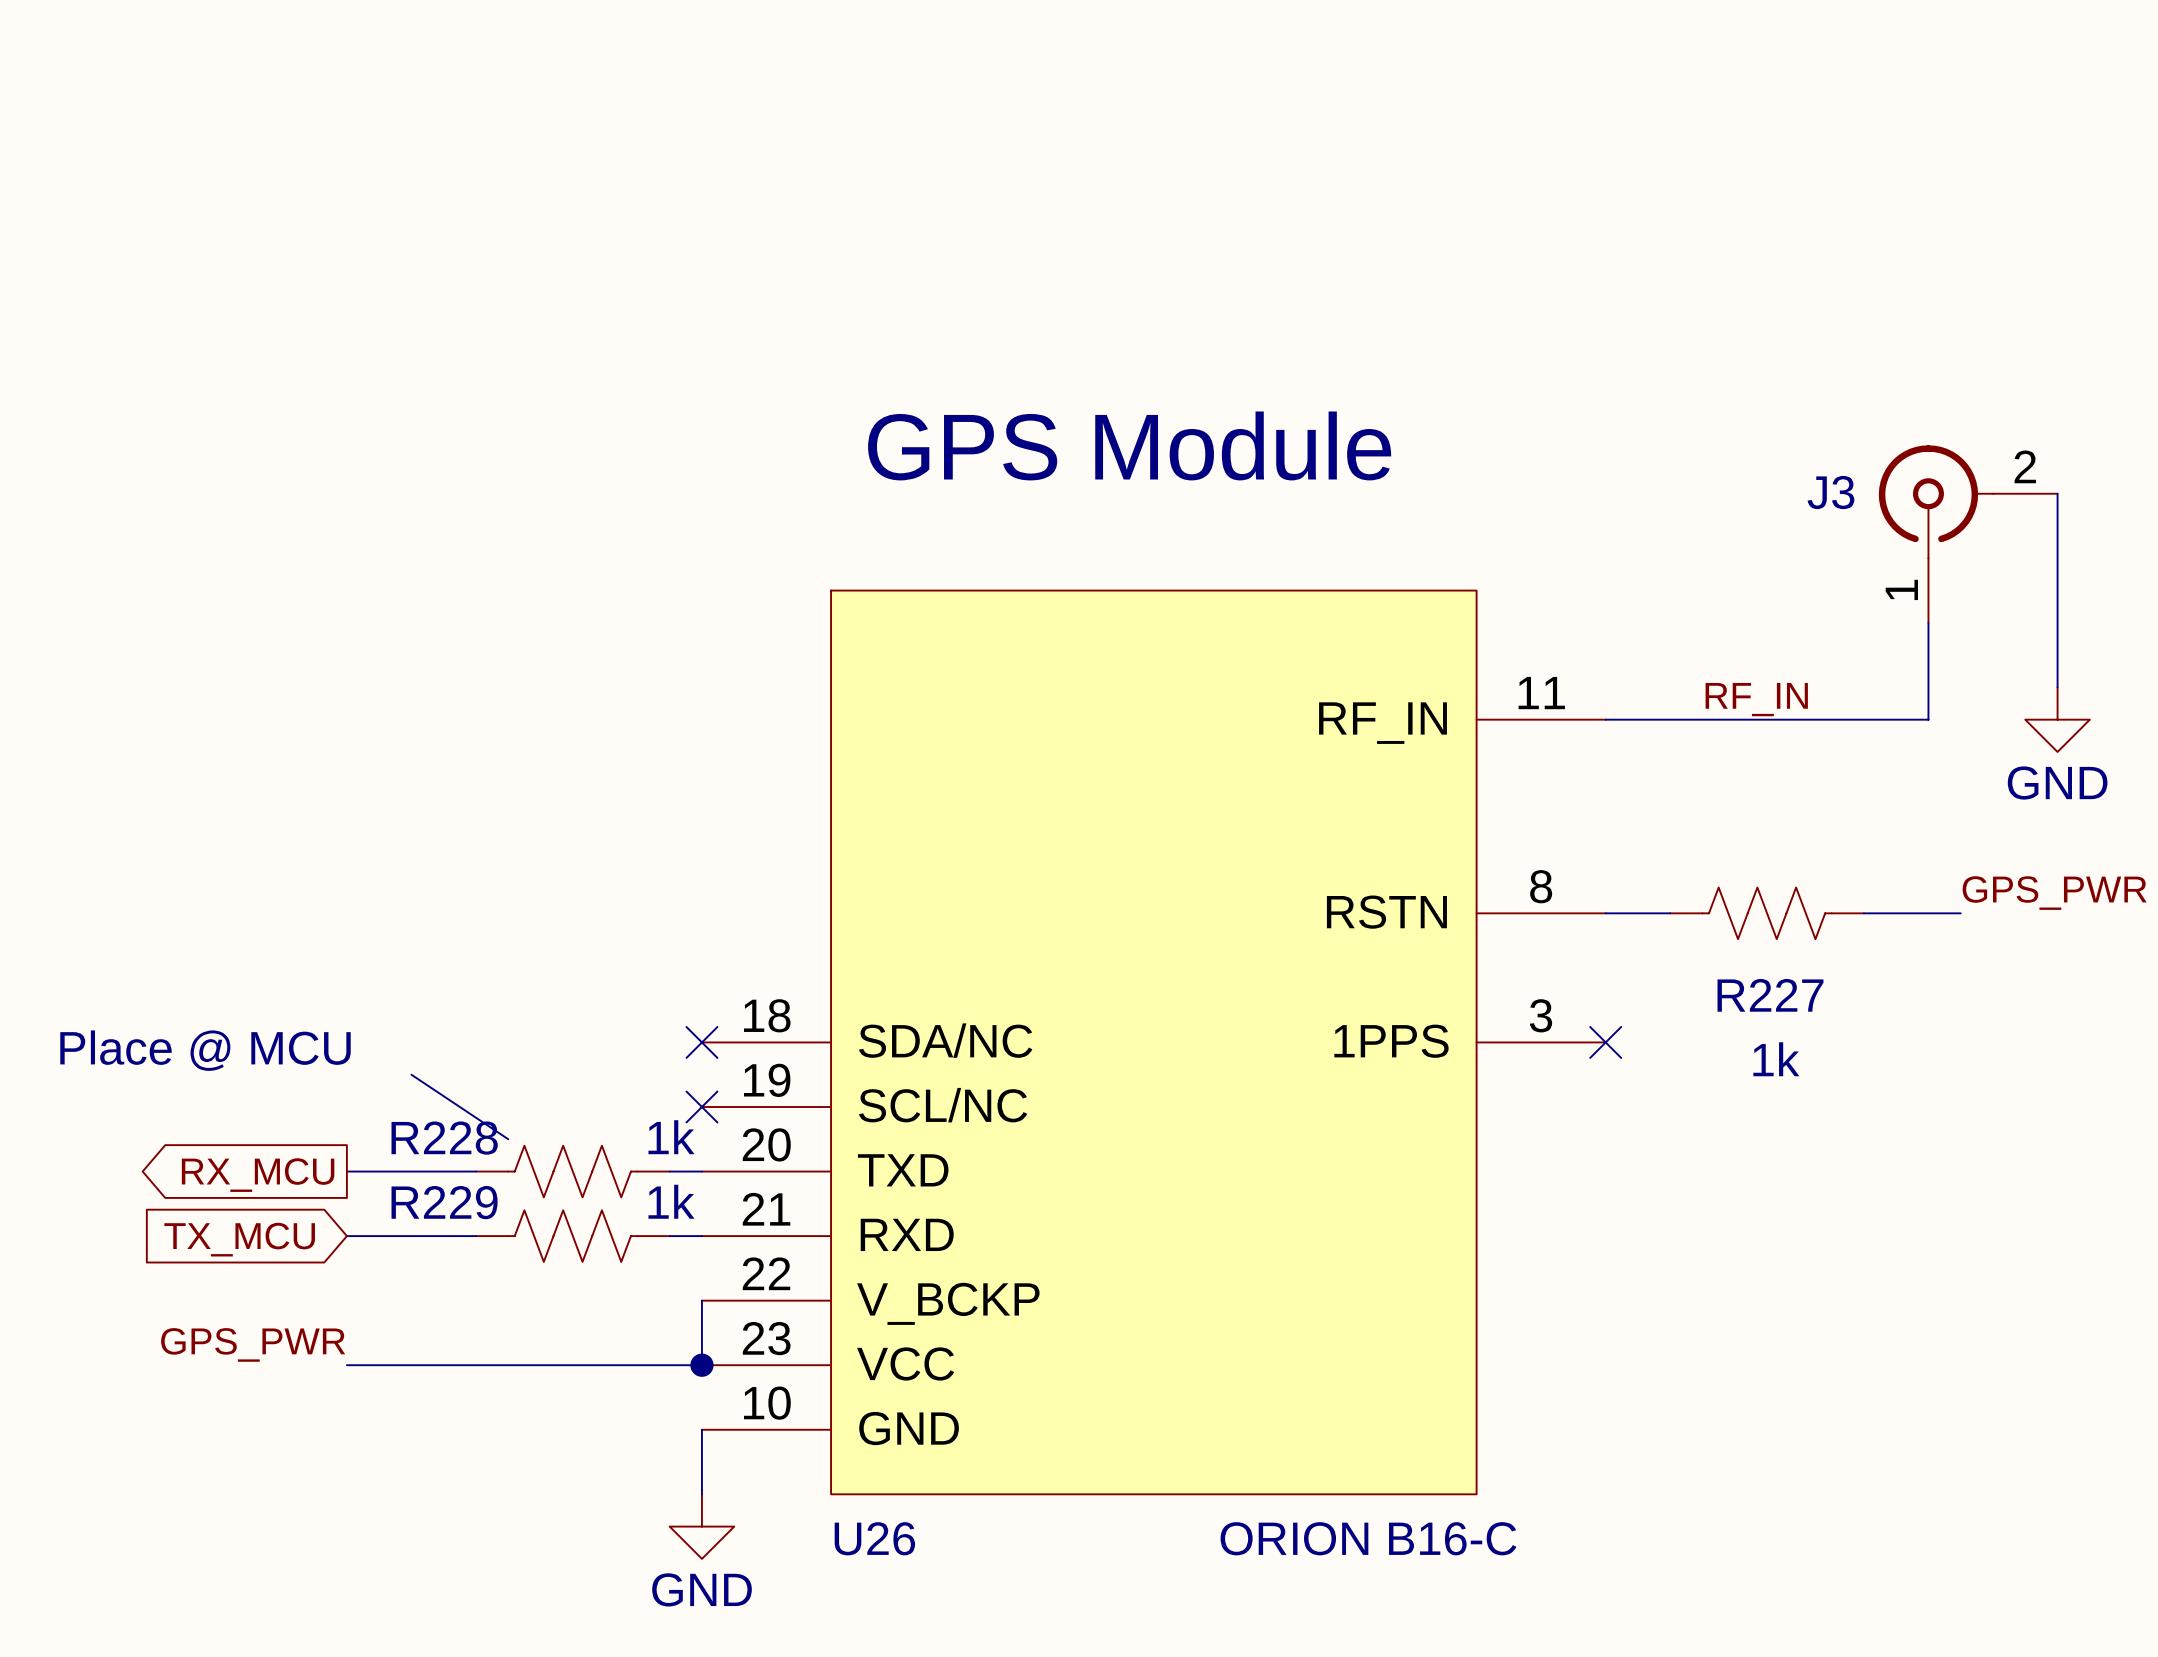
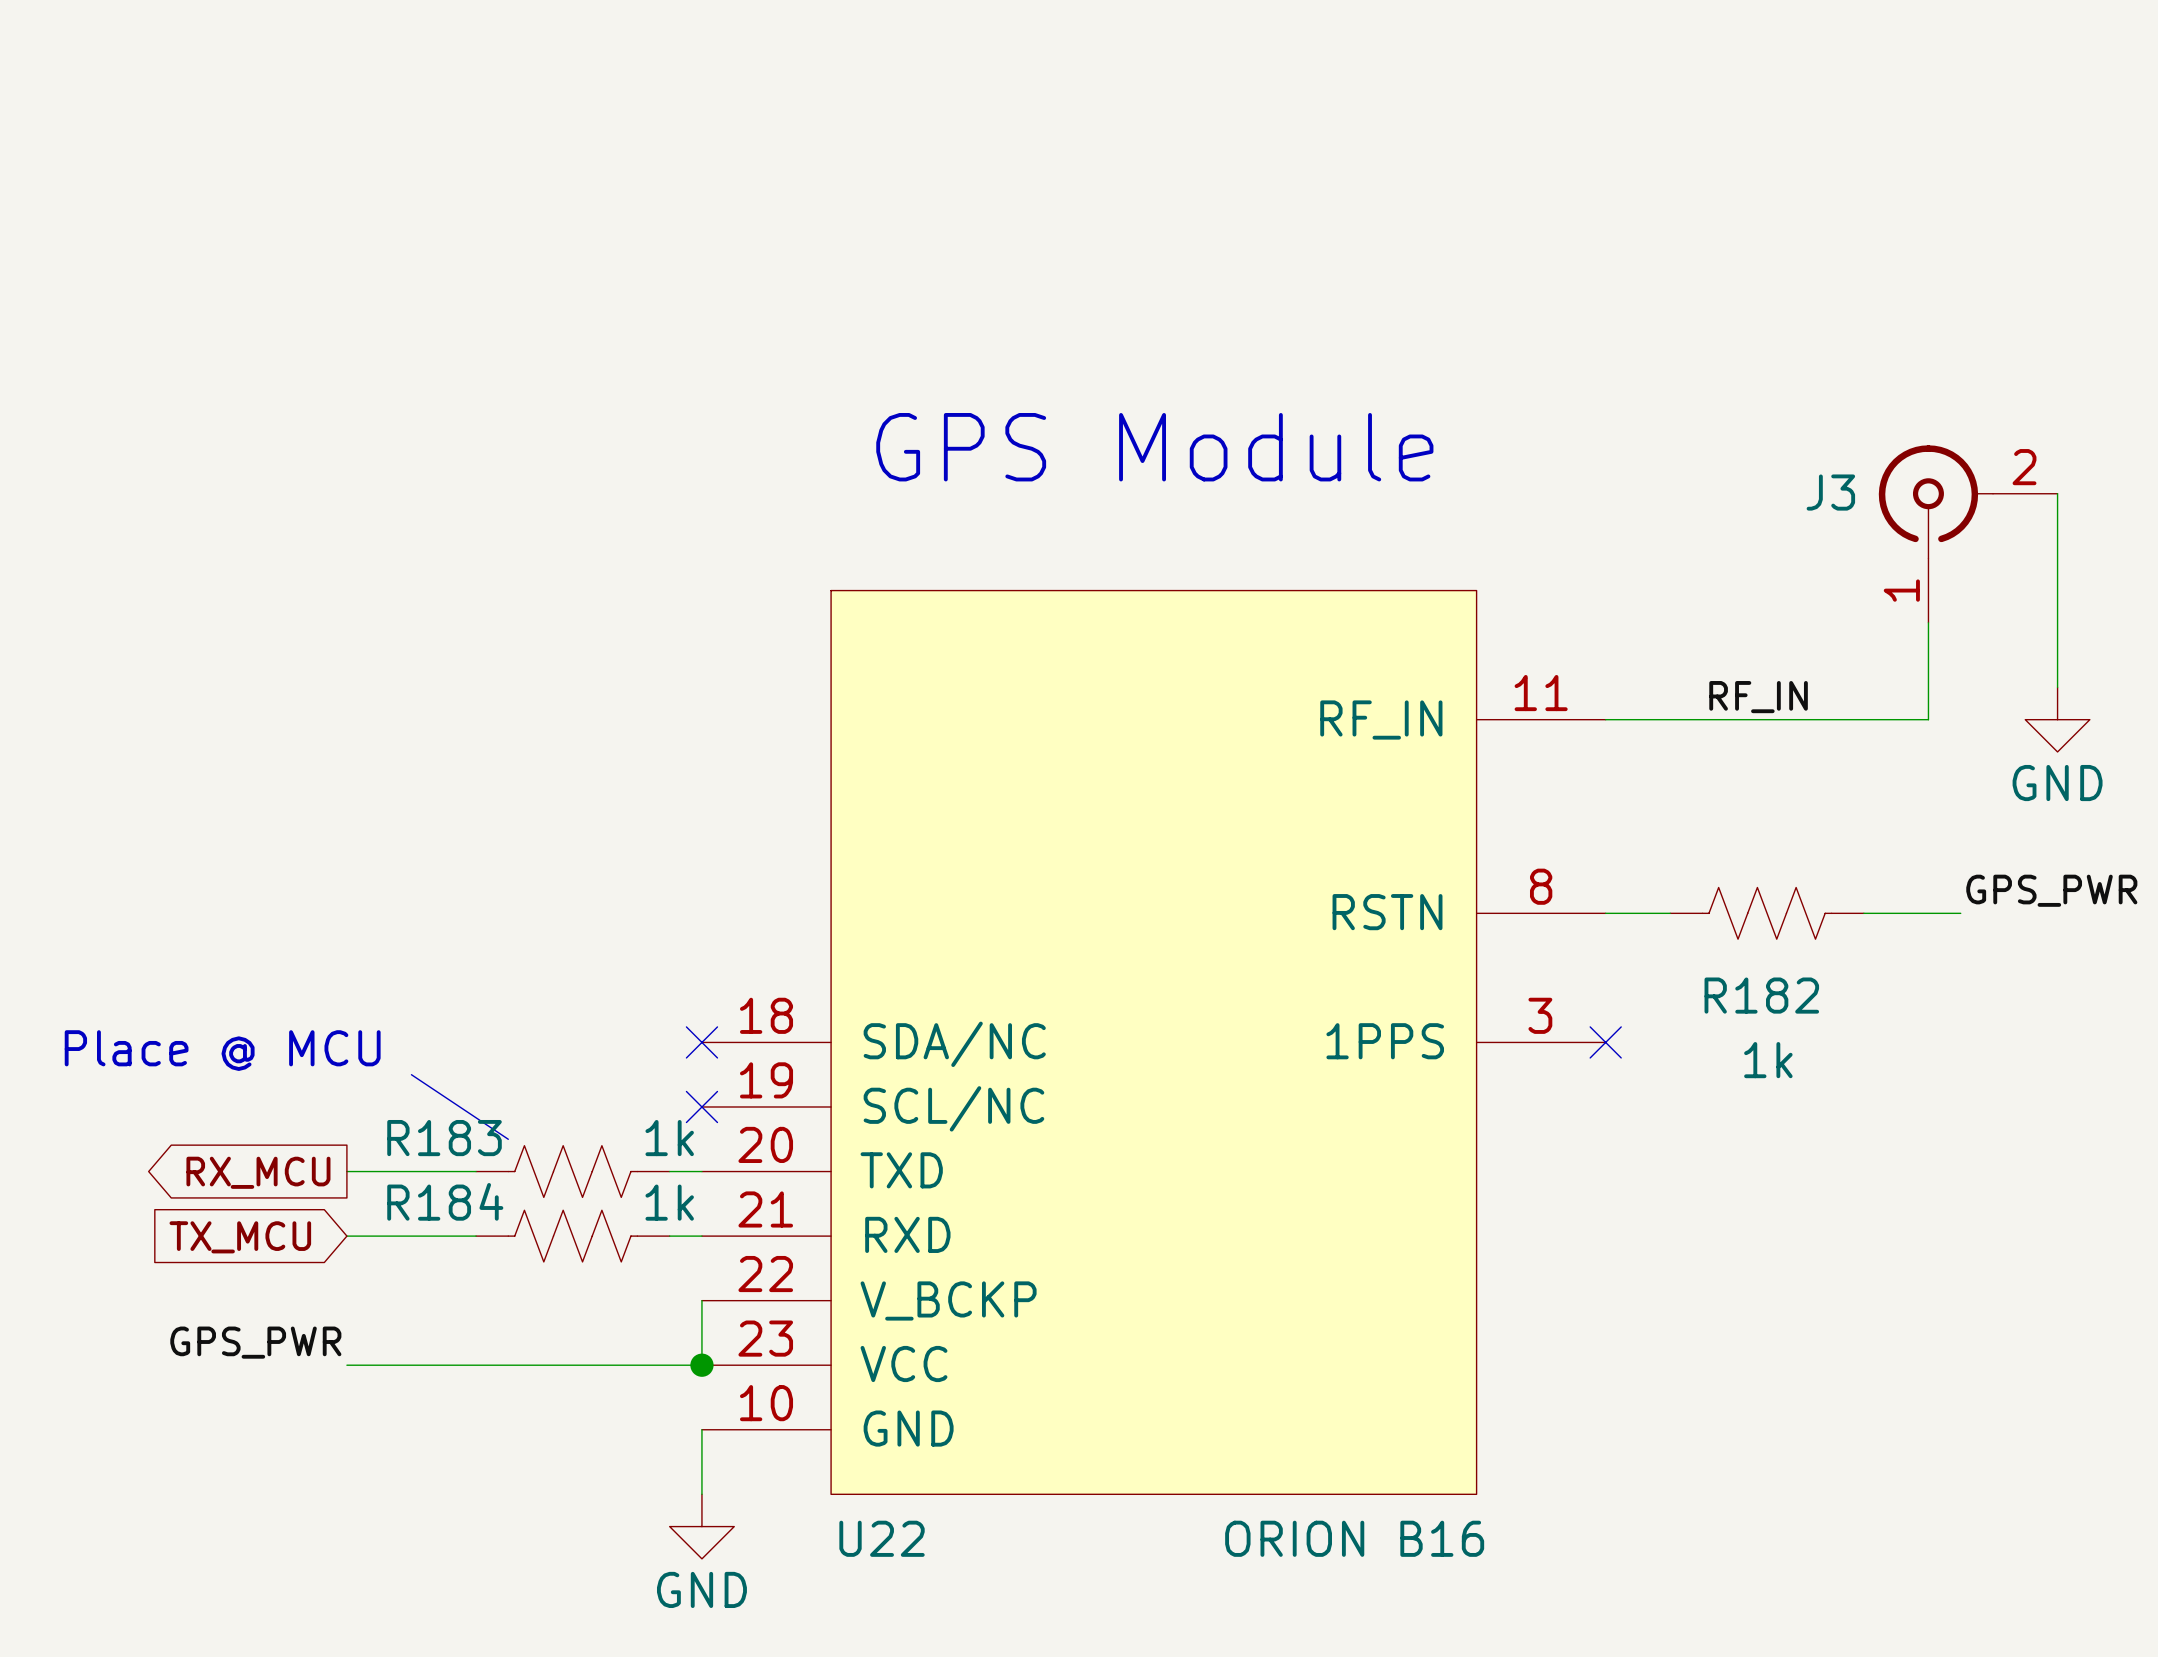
R227 name: R227 (1770, 995) -> R182 (1761, 995)
R228 name: R228 (444, 1138) -> R183 (444, 1138)
R229 name: R229 (444, 1202) -> R184 (445, 1201)
U26 name: U26 (874, 1538) -> U22 (882, 1538)
U26 value: ORION B16-C (1368, 1538) -> ORION B16 (1354, 1538)

